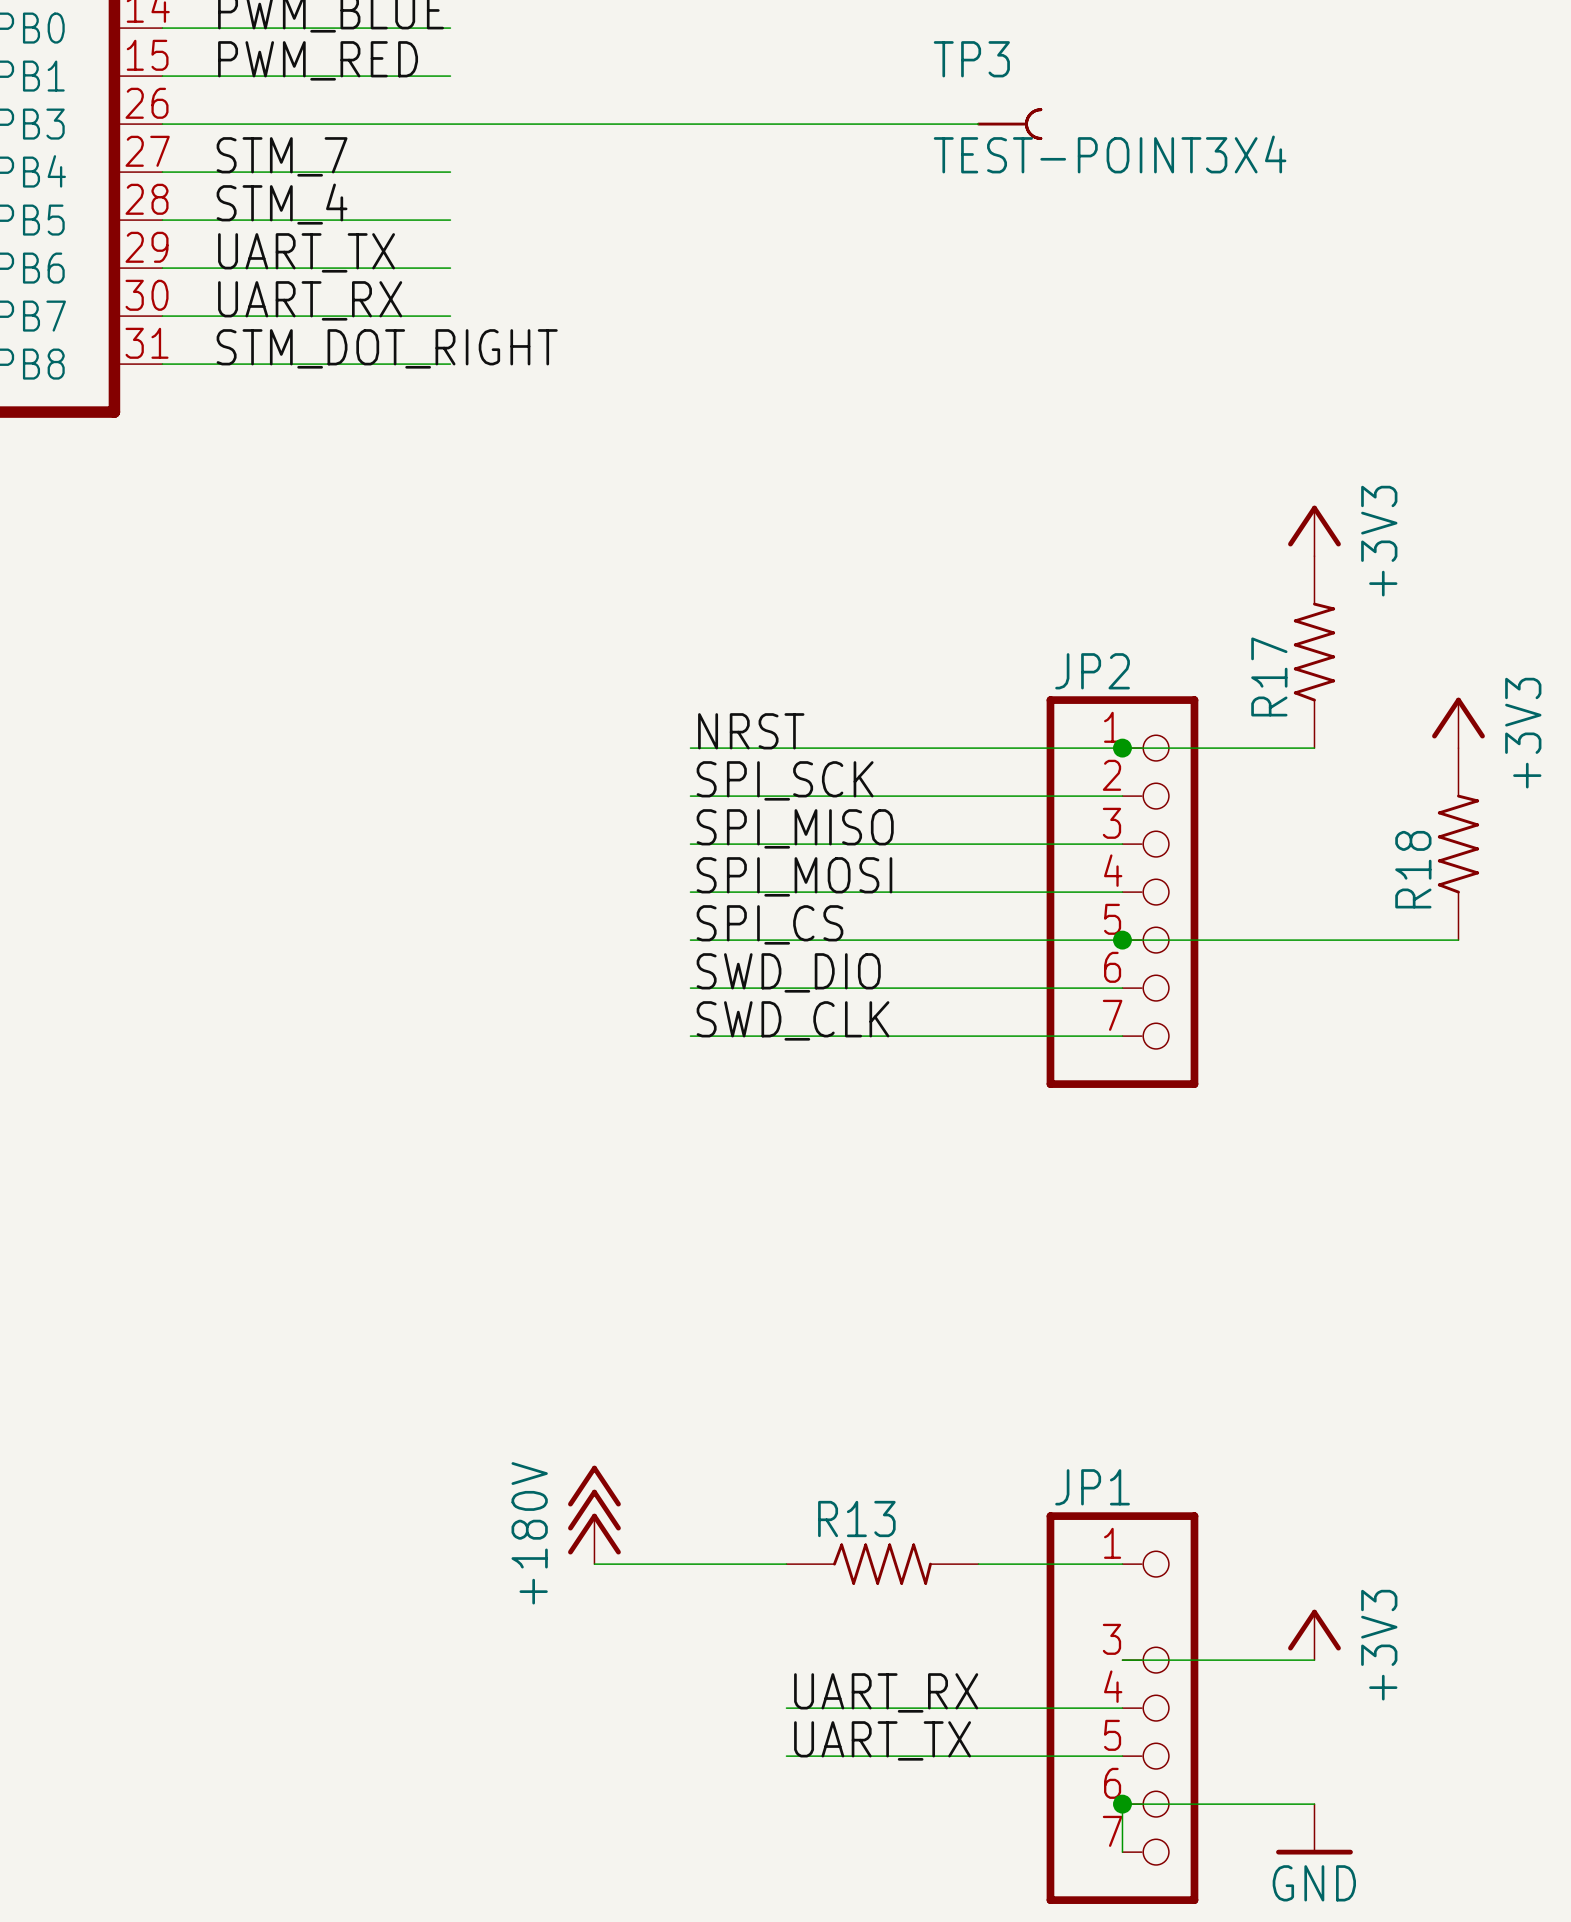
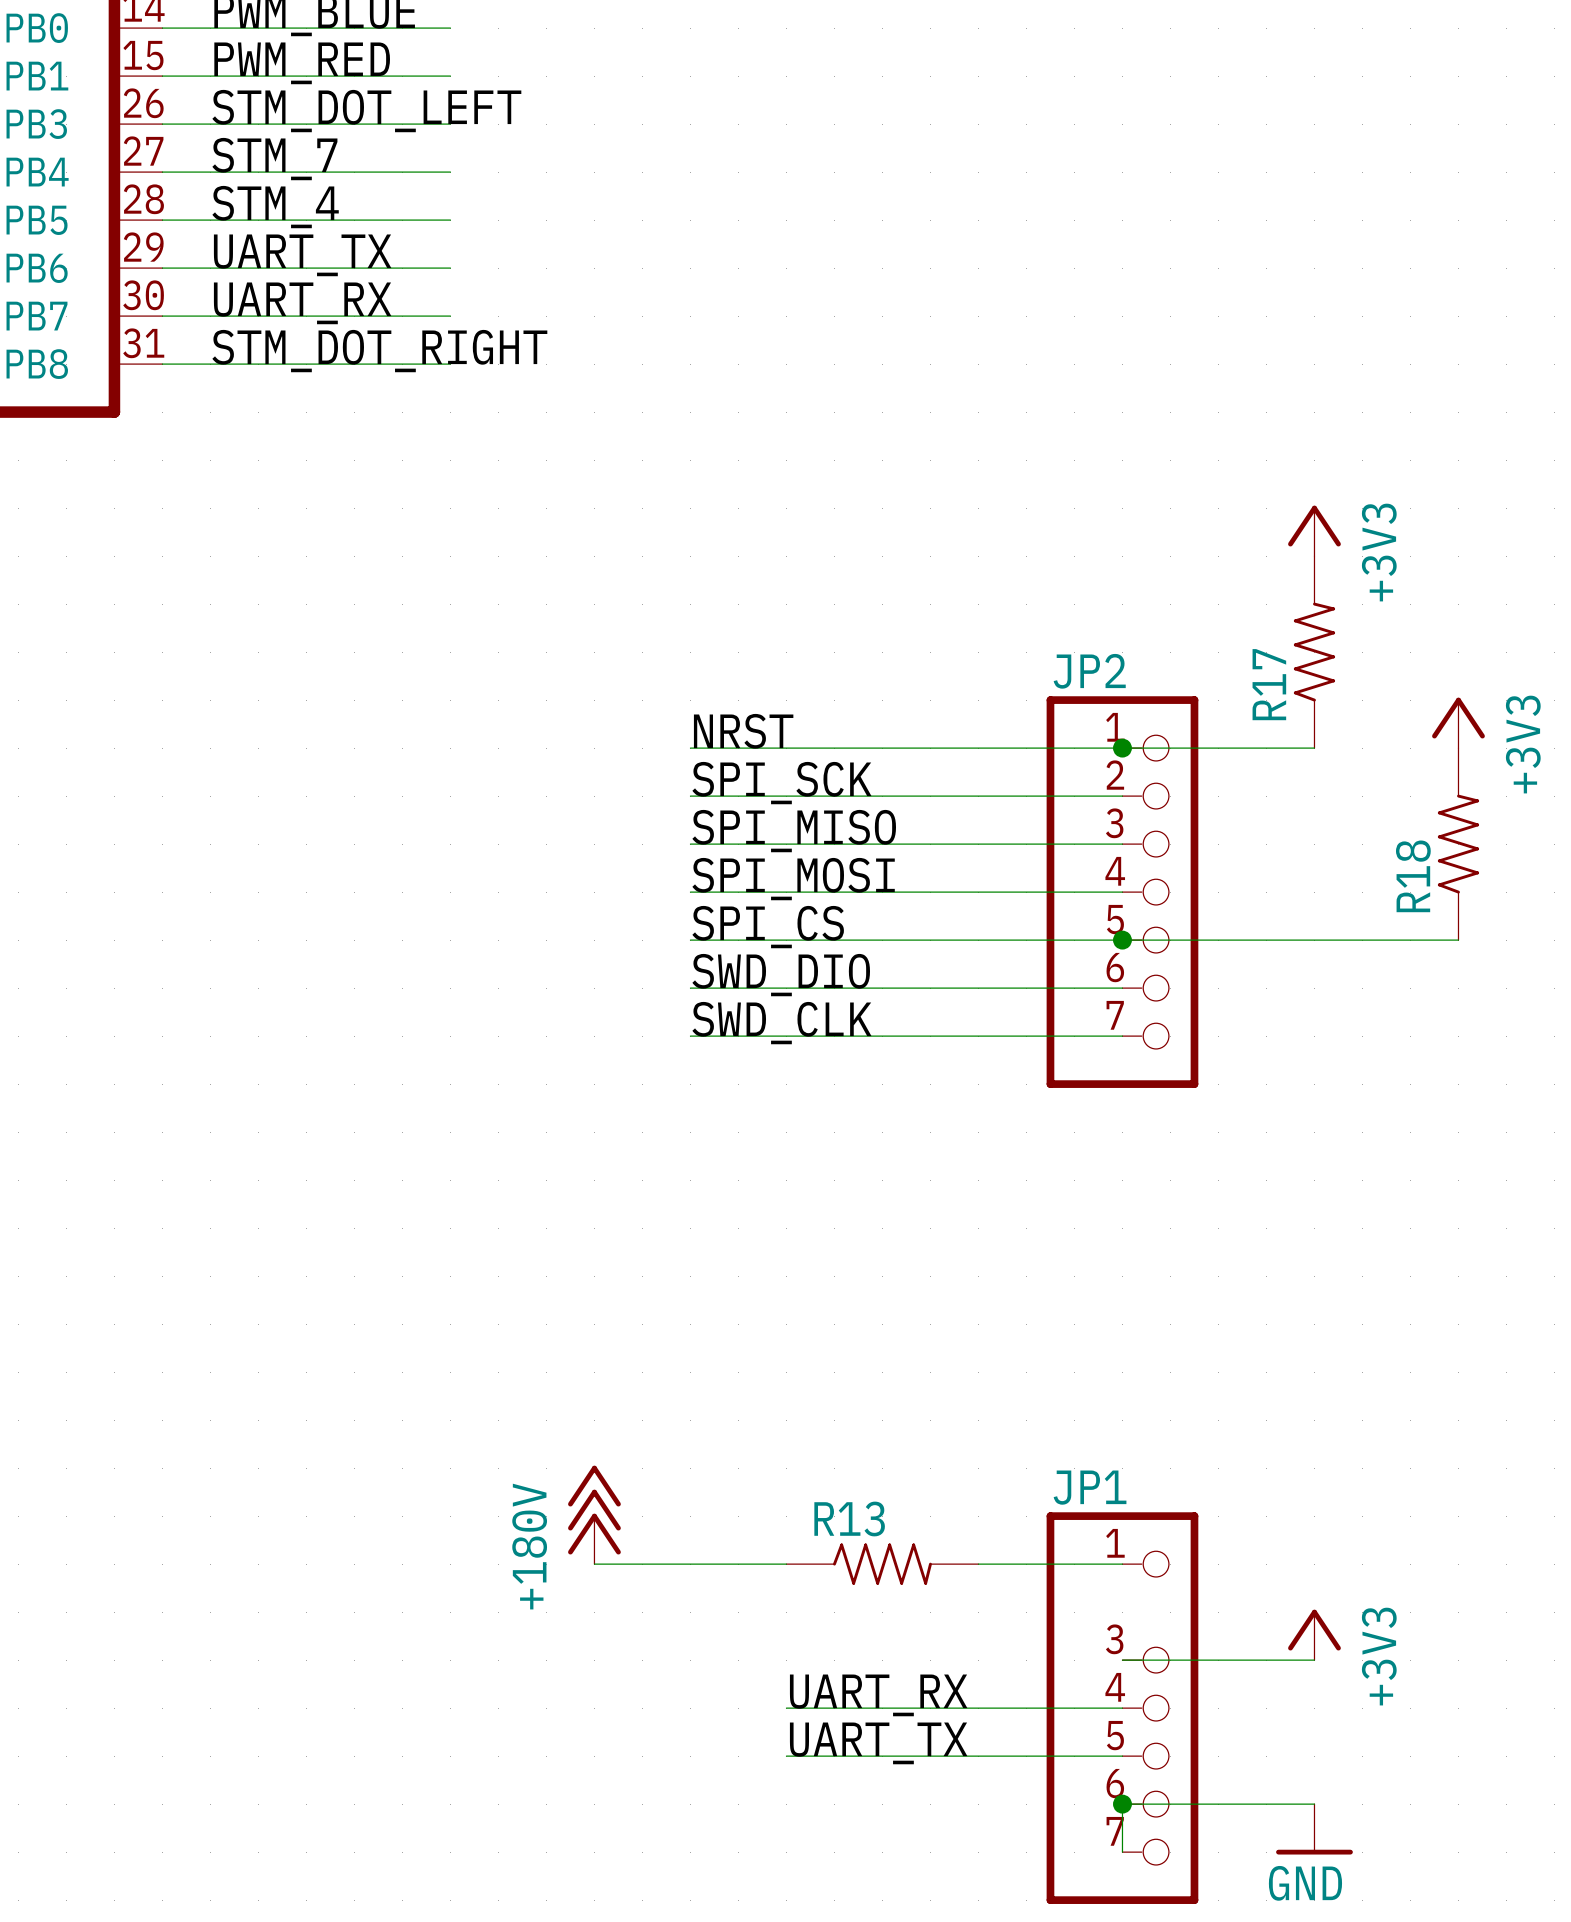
label: none -> STM_DOT_LEFT (366, 111)
wire: (450, 124) (978, 124) -> none
TP3: TEST-POINT3X4 (1009, 124) -> none

